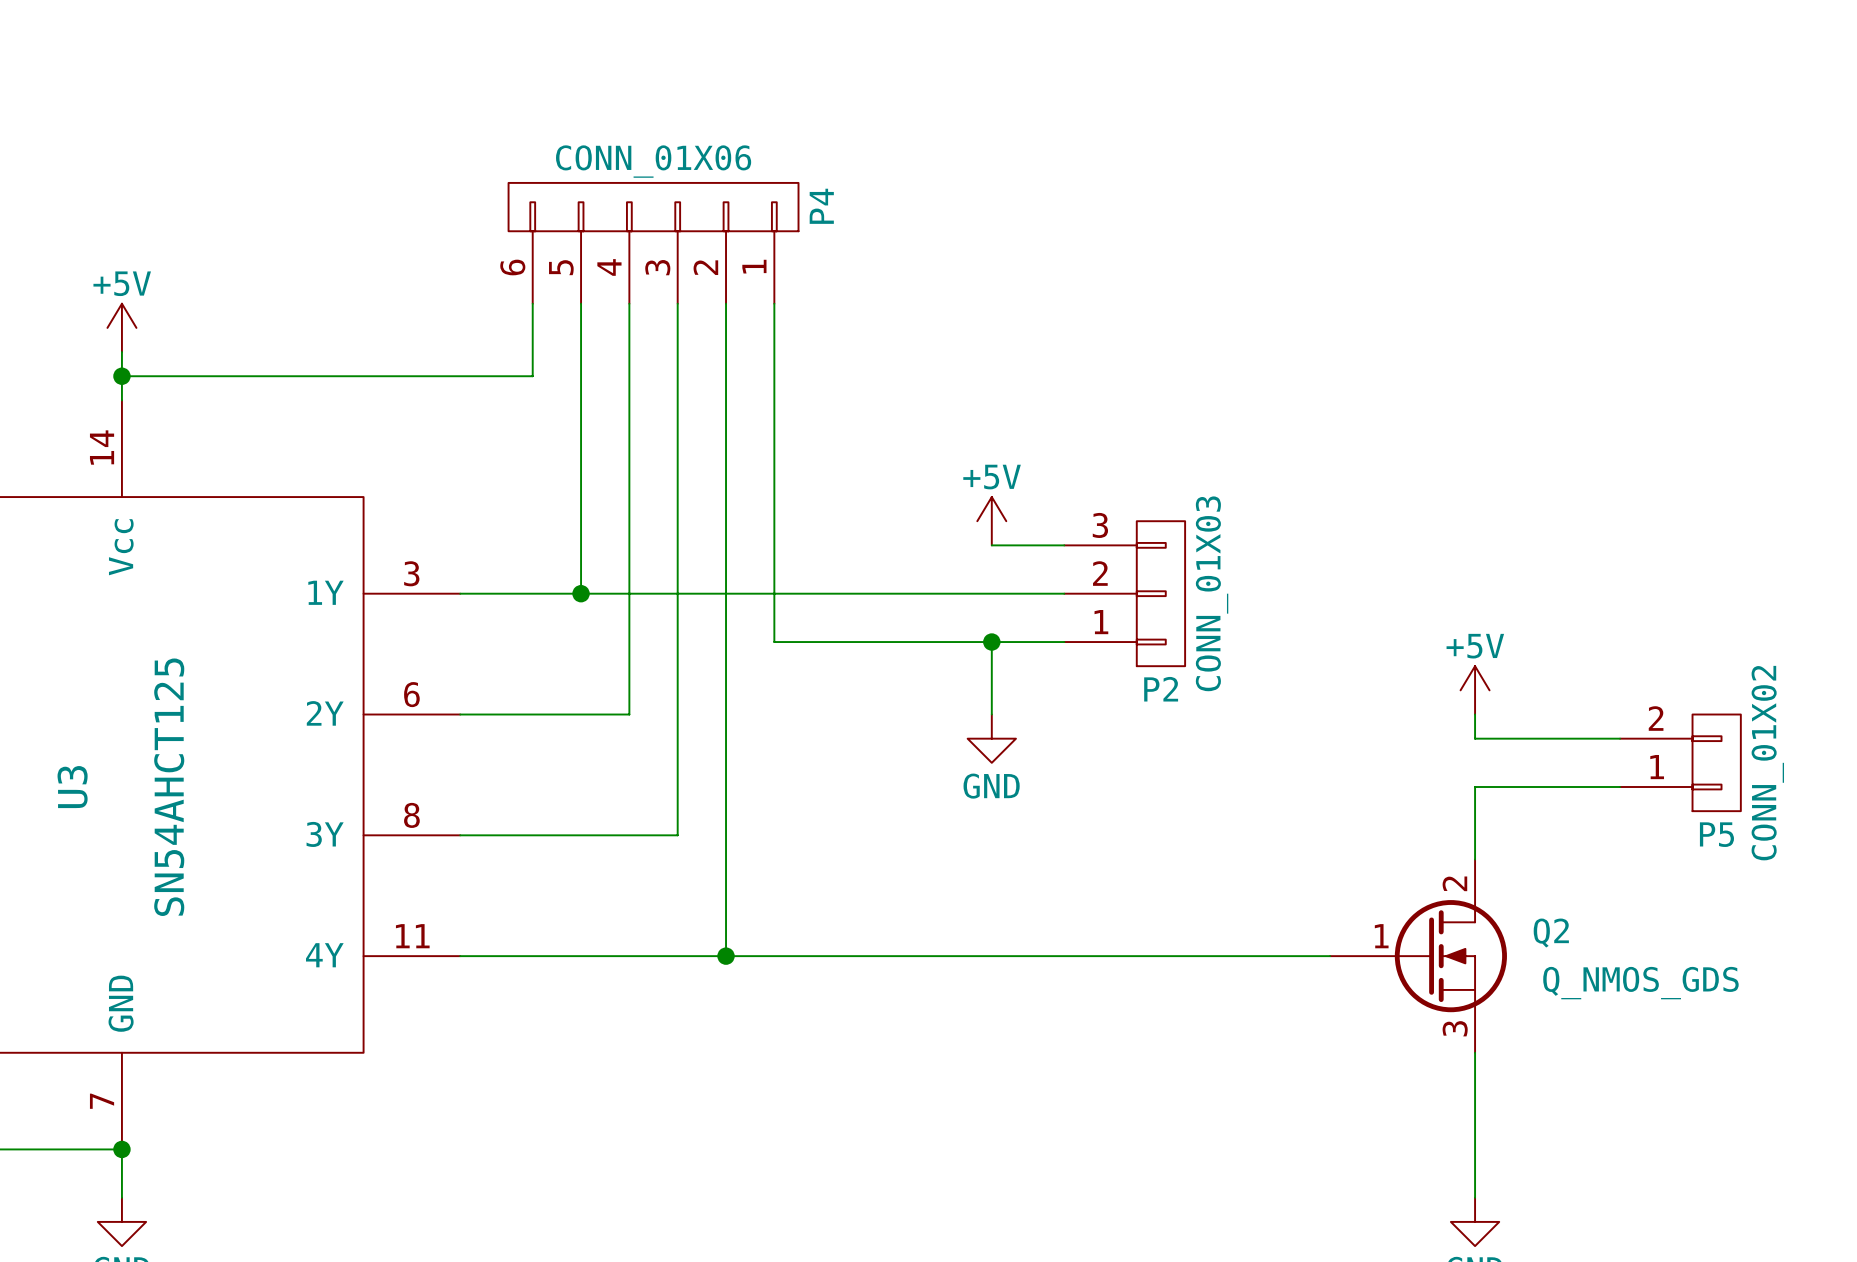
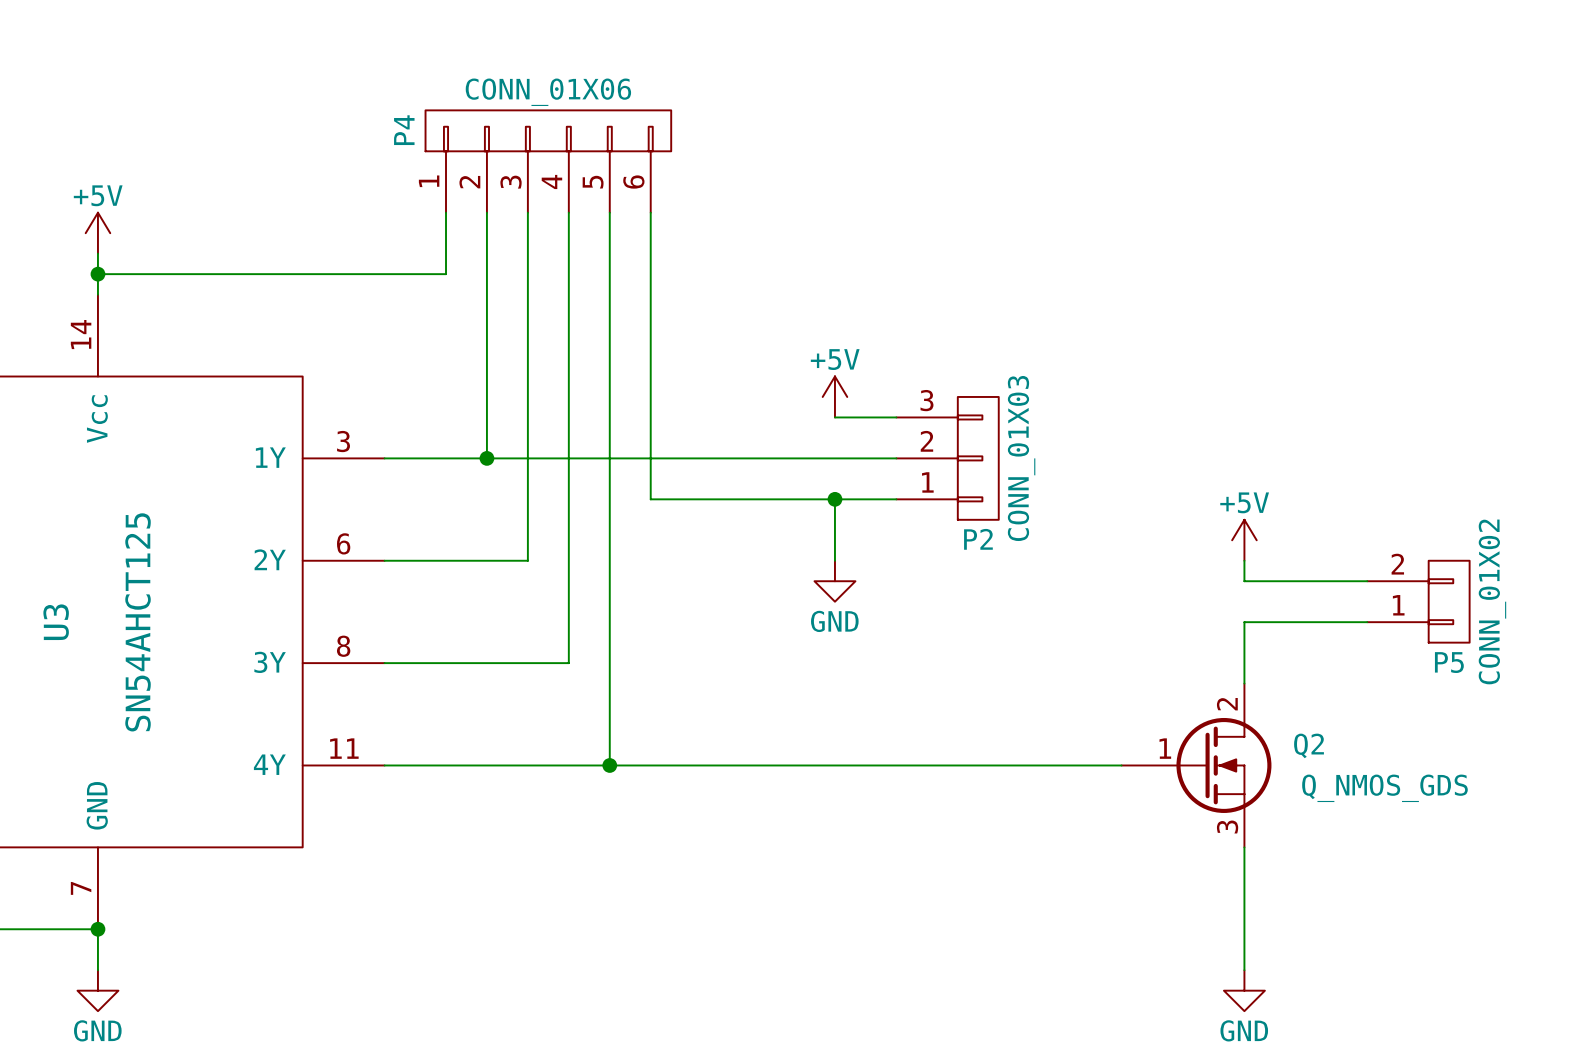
P4 flip: as is (653, 207) -> left-right (548, 130)

